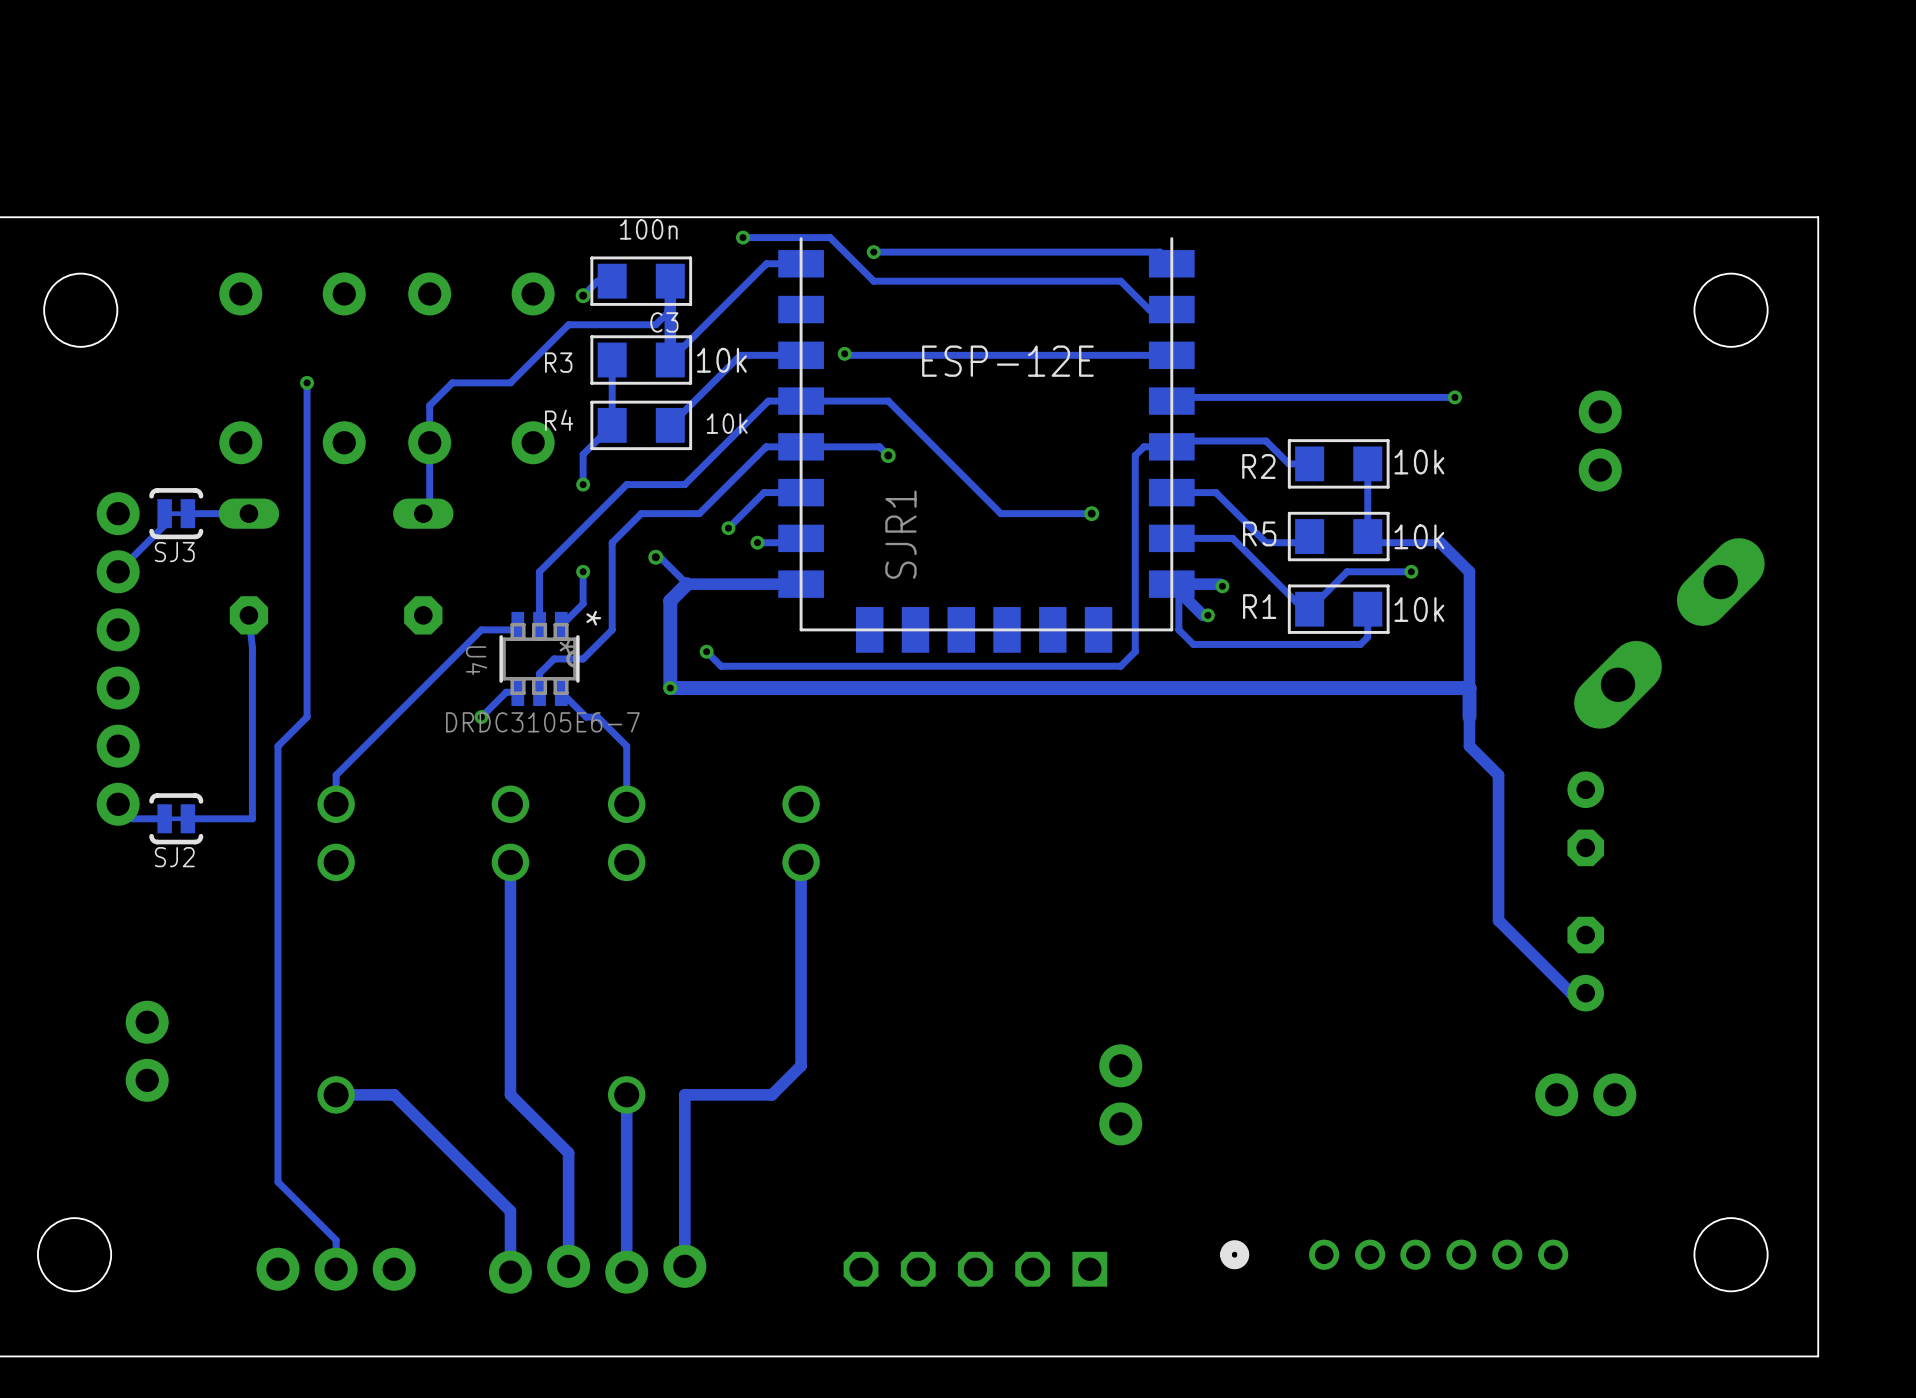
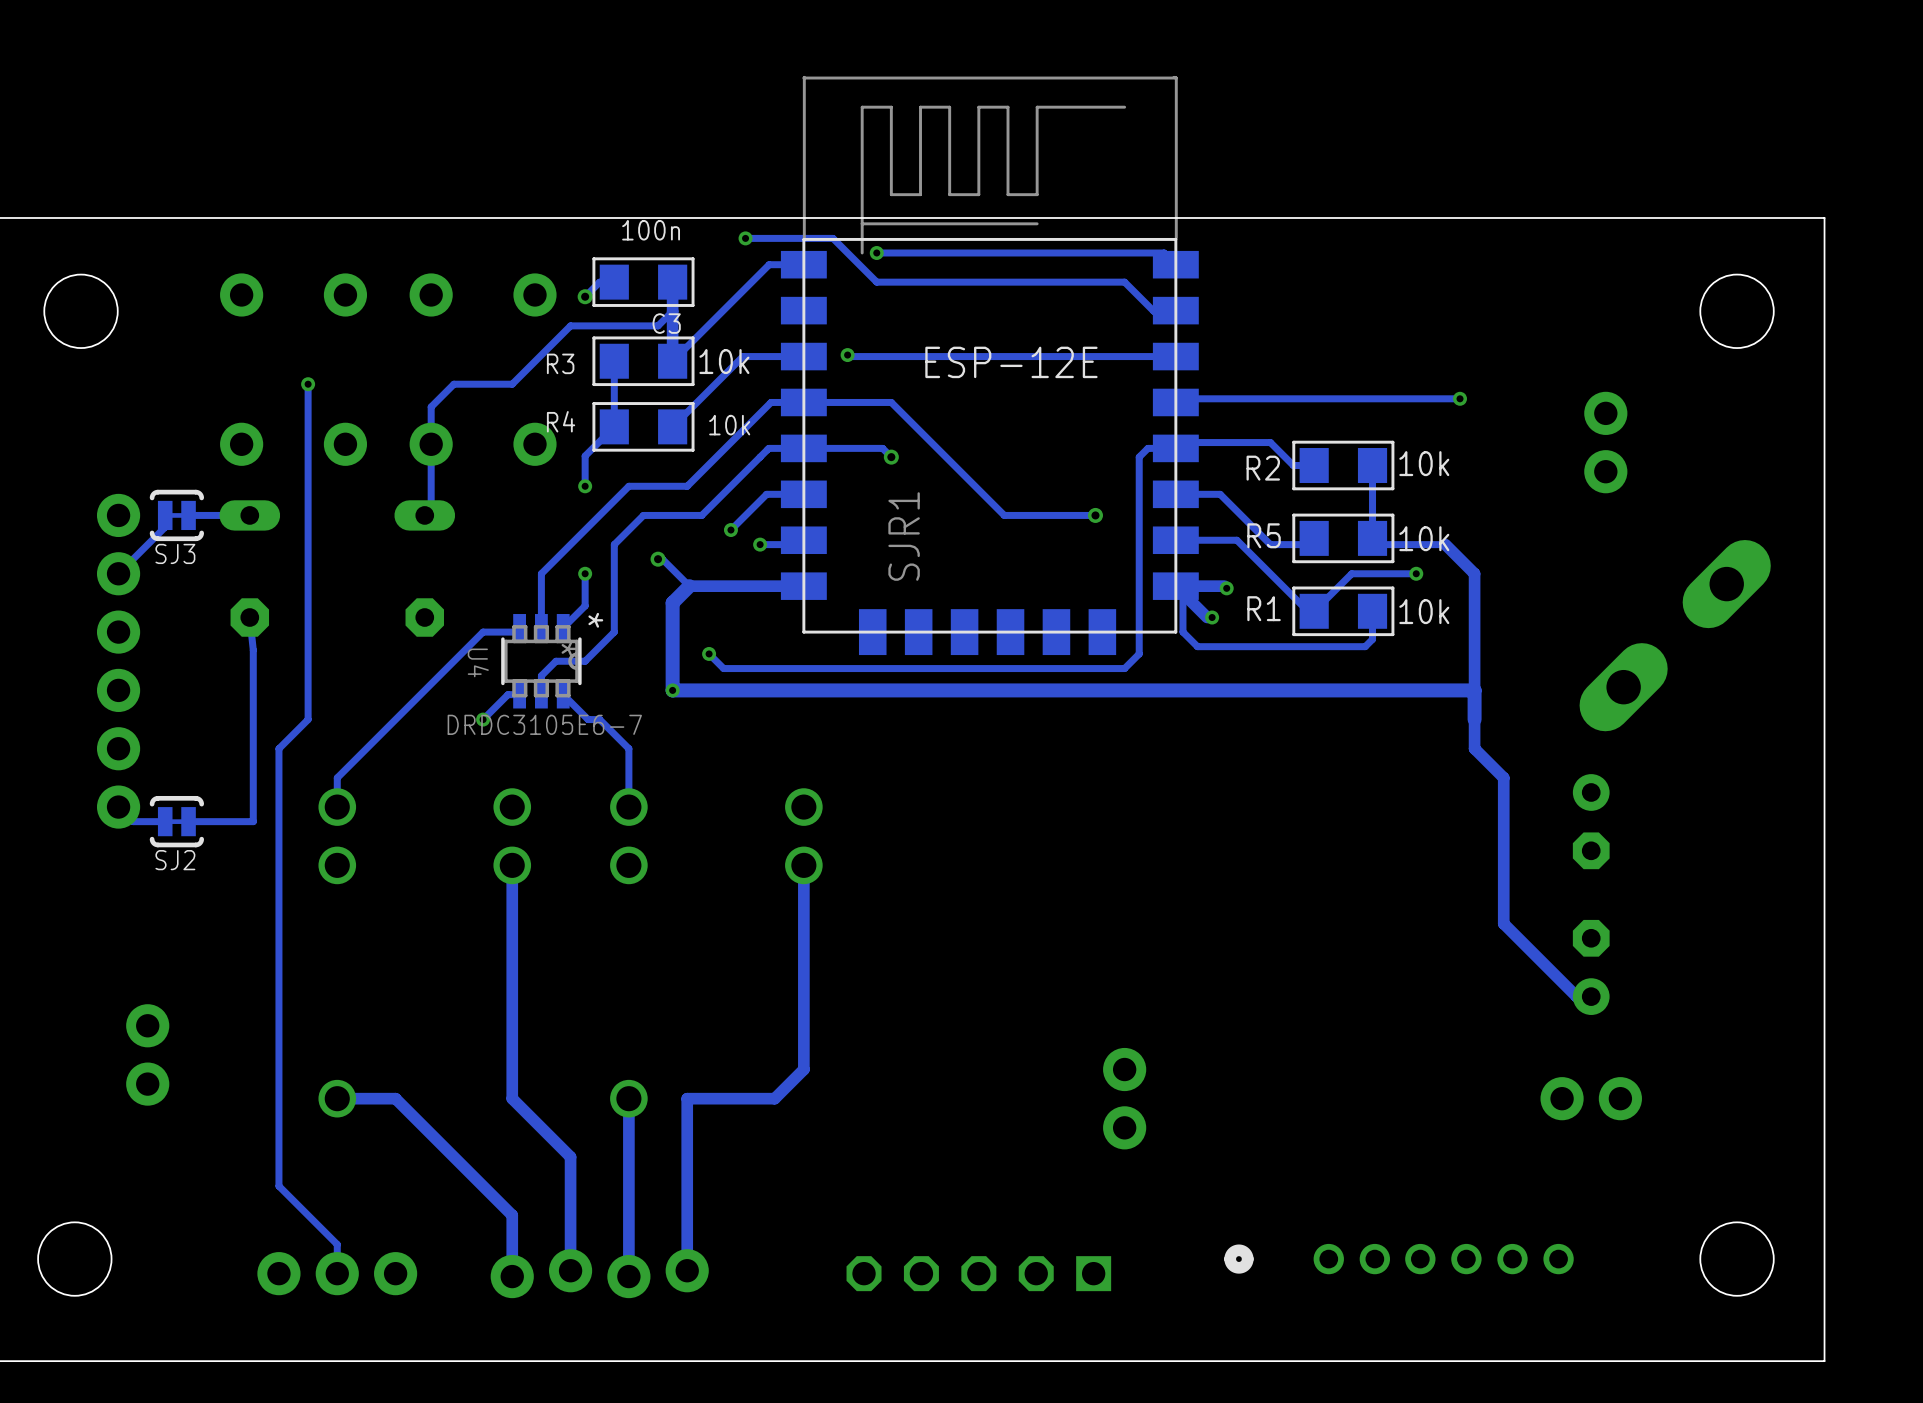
SJR1 footprint: [778, 237, 1195, 653] -> [780, 75, 1199, 656]

